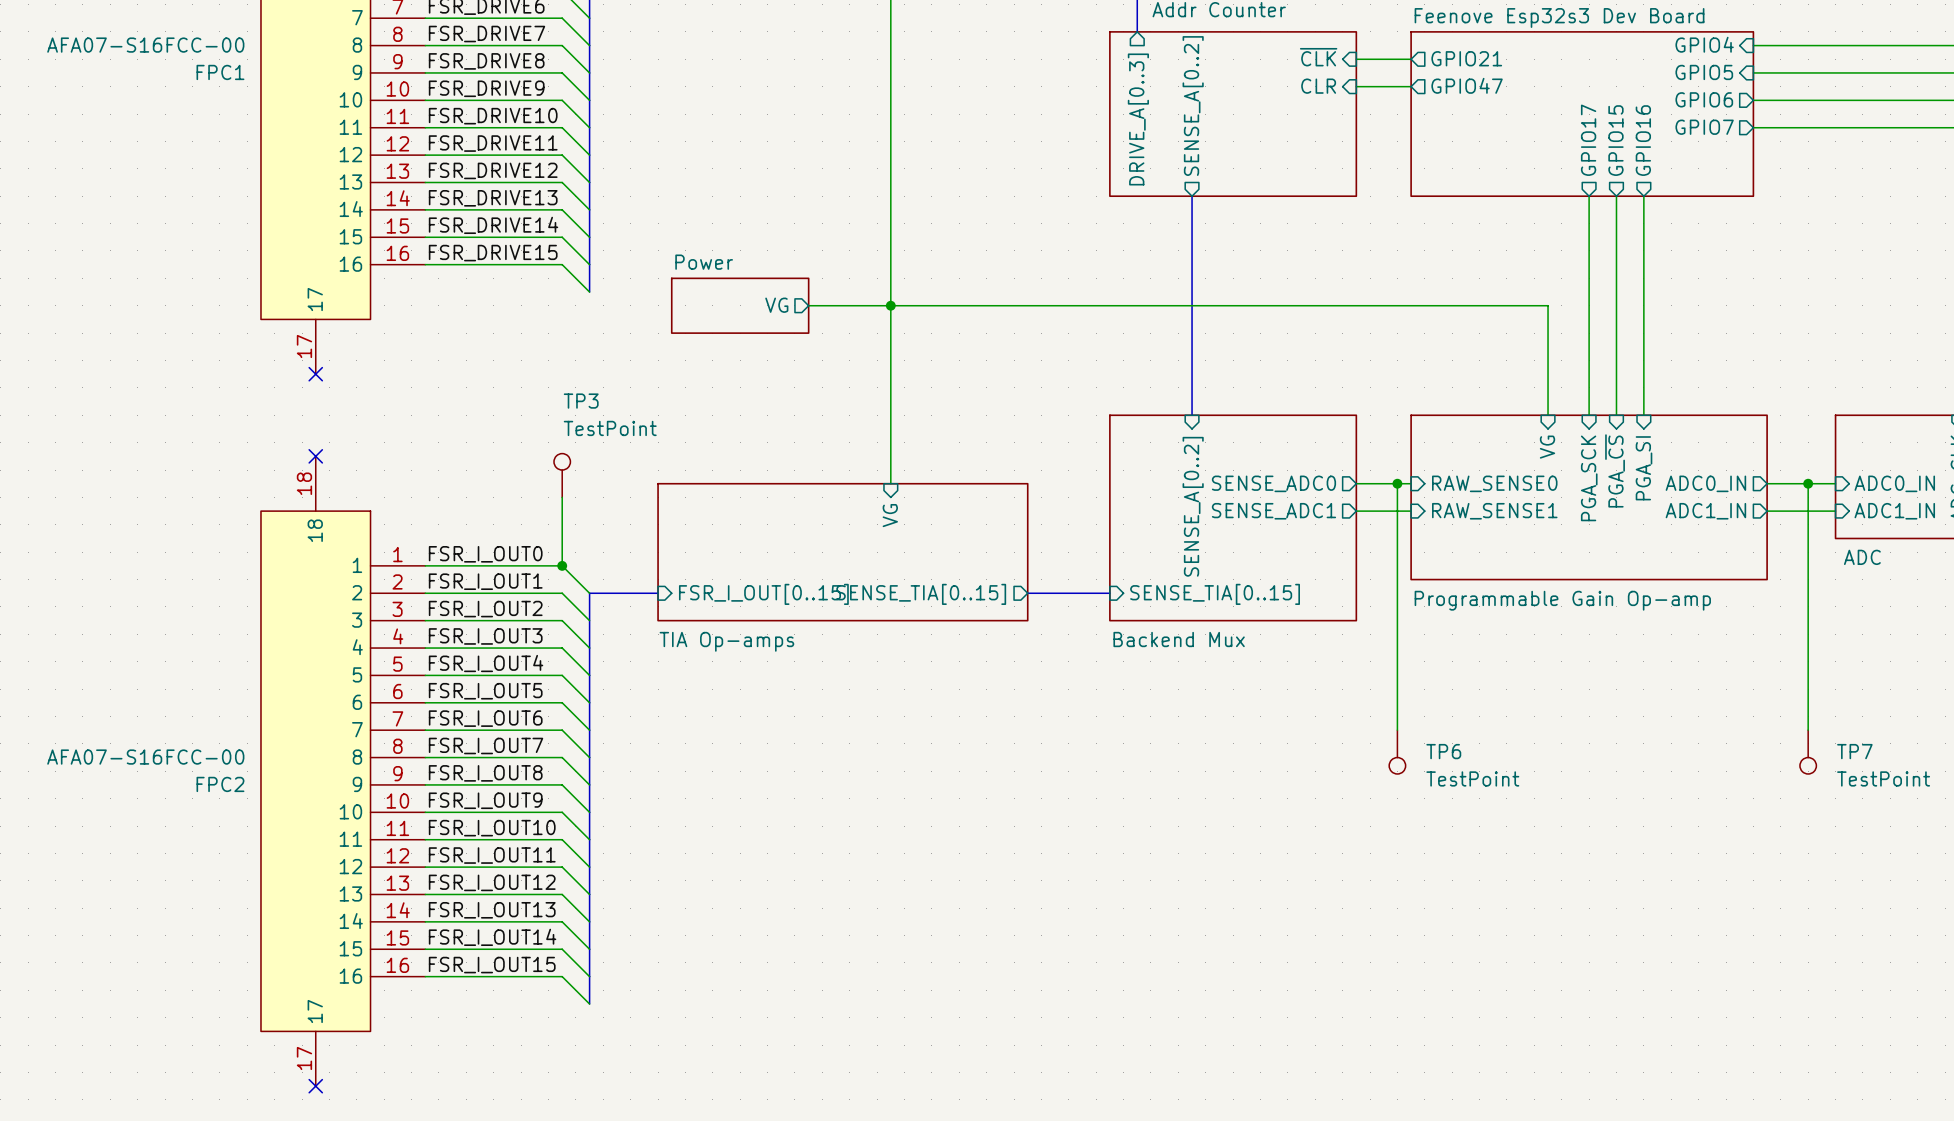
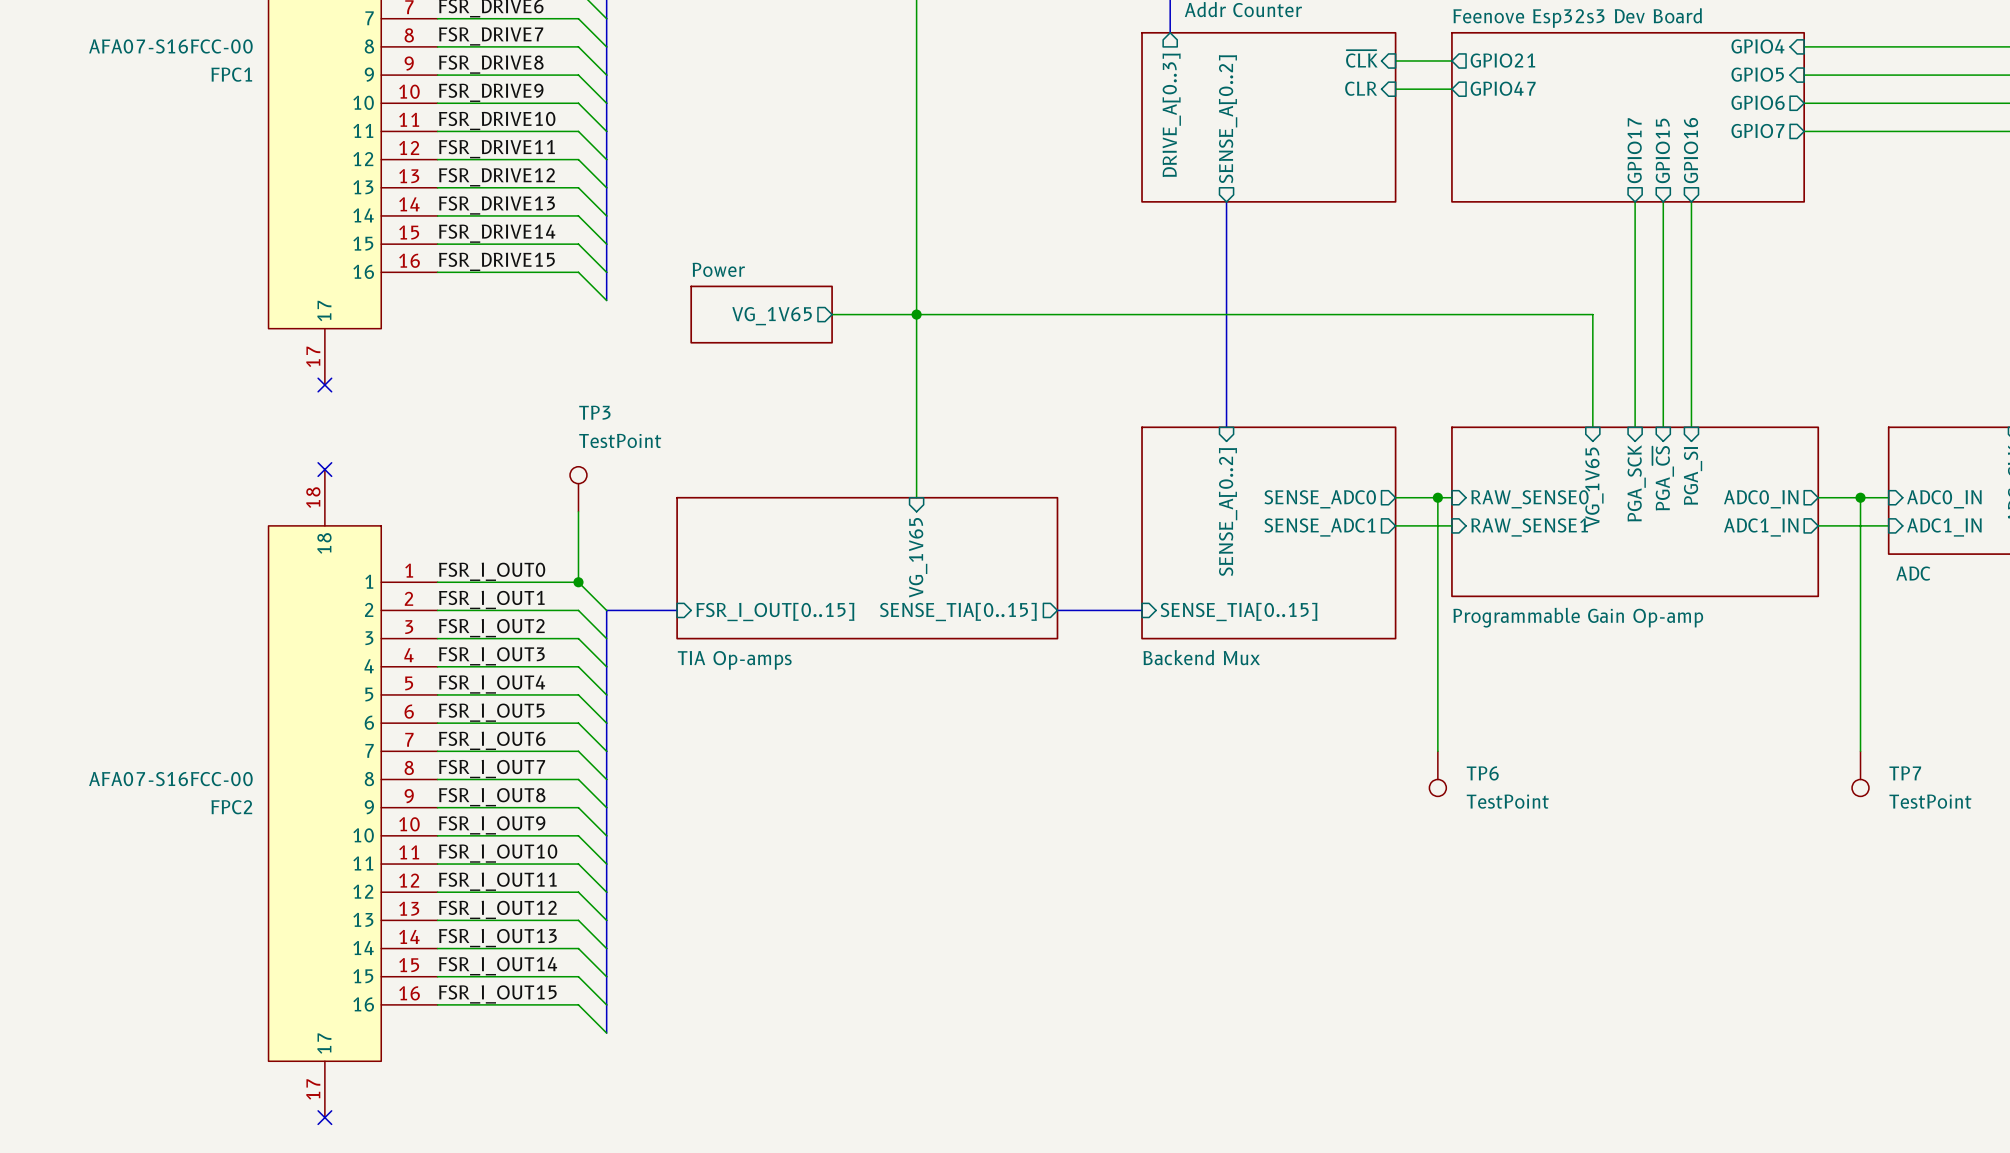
sheet pin: VG (776, 305) -> VG_1V65 (772, 316)
sheet pin: VG (1547, 447) -> VG_1V65 (1594, 487)
sheet pin: VG (890, 515) -> VG_1V65 (918, 557)

